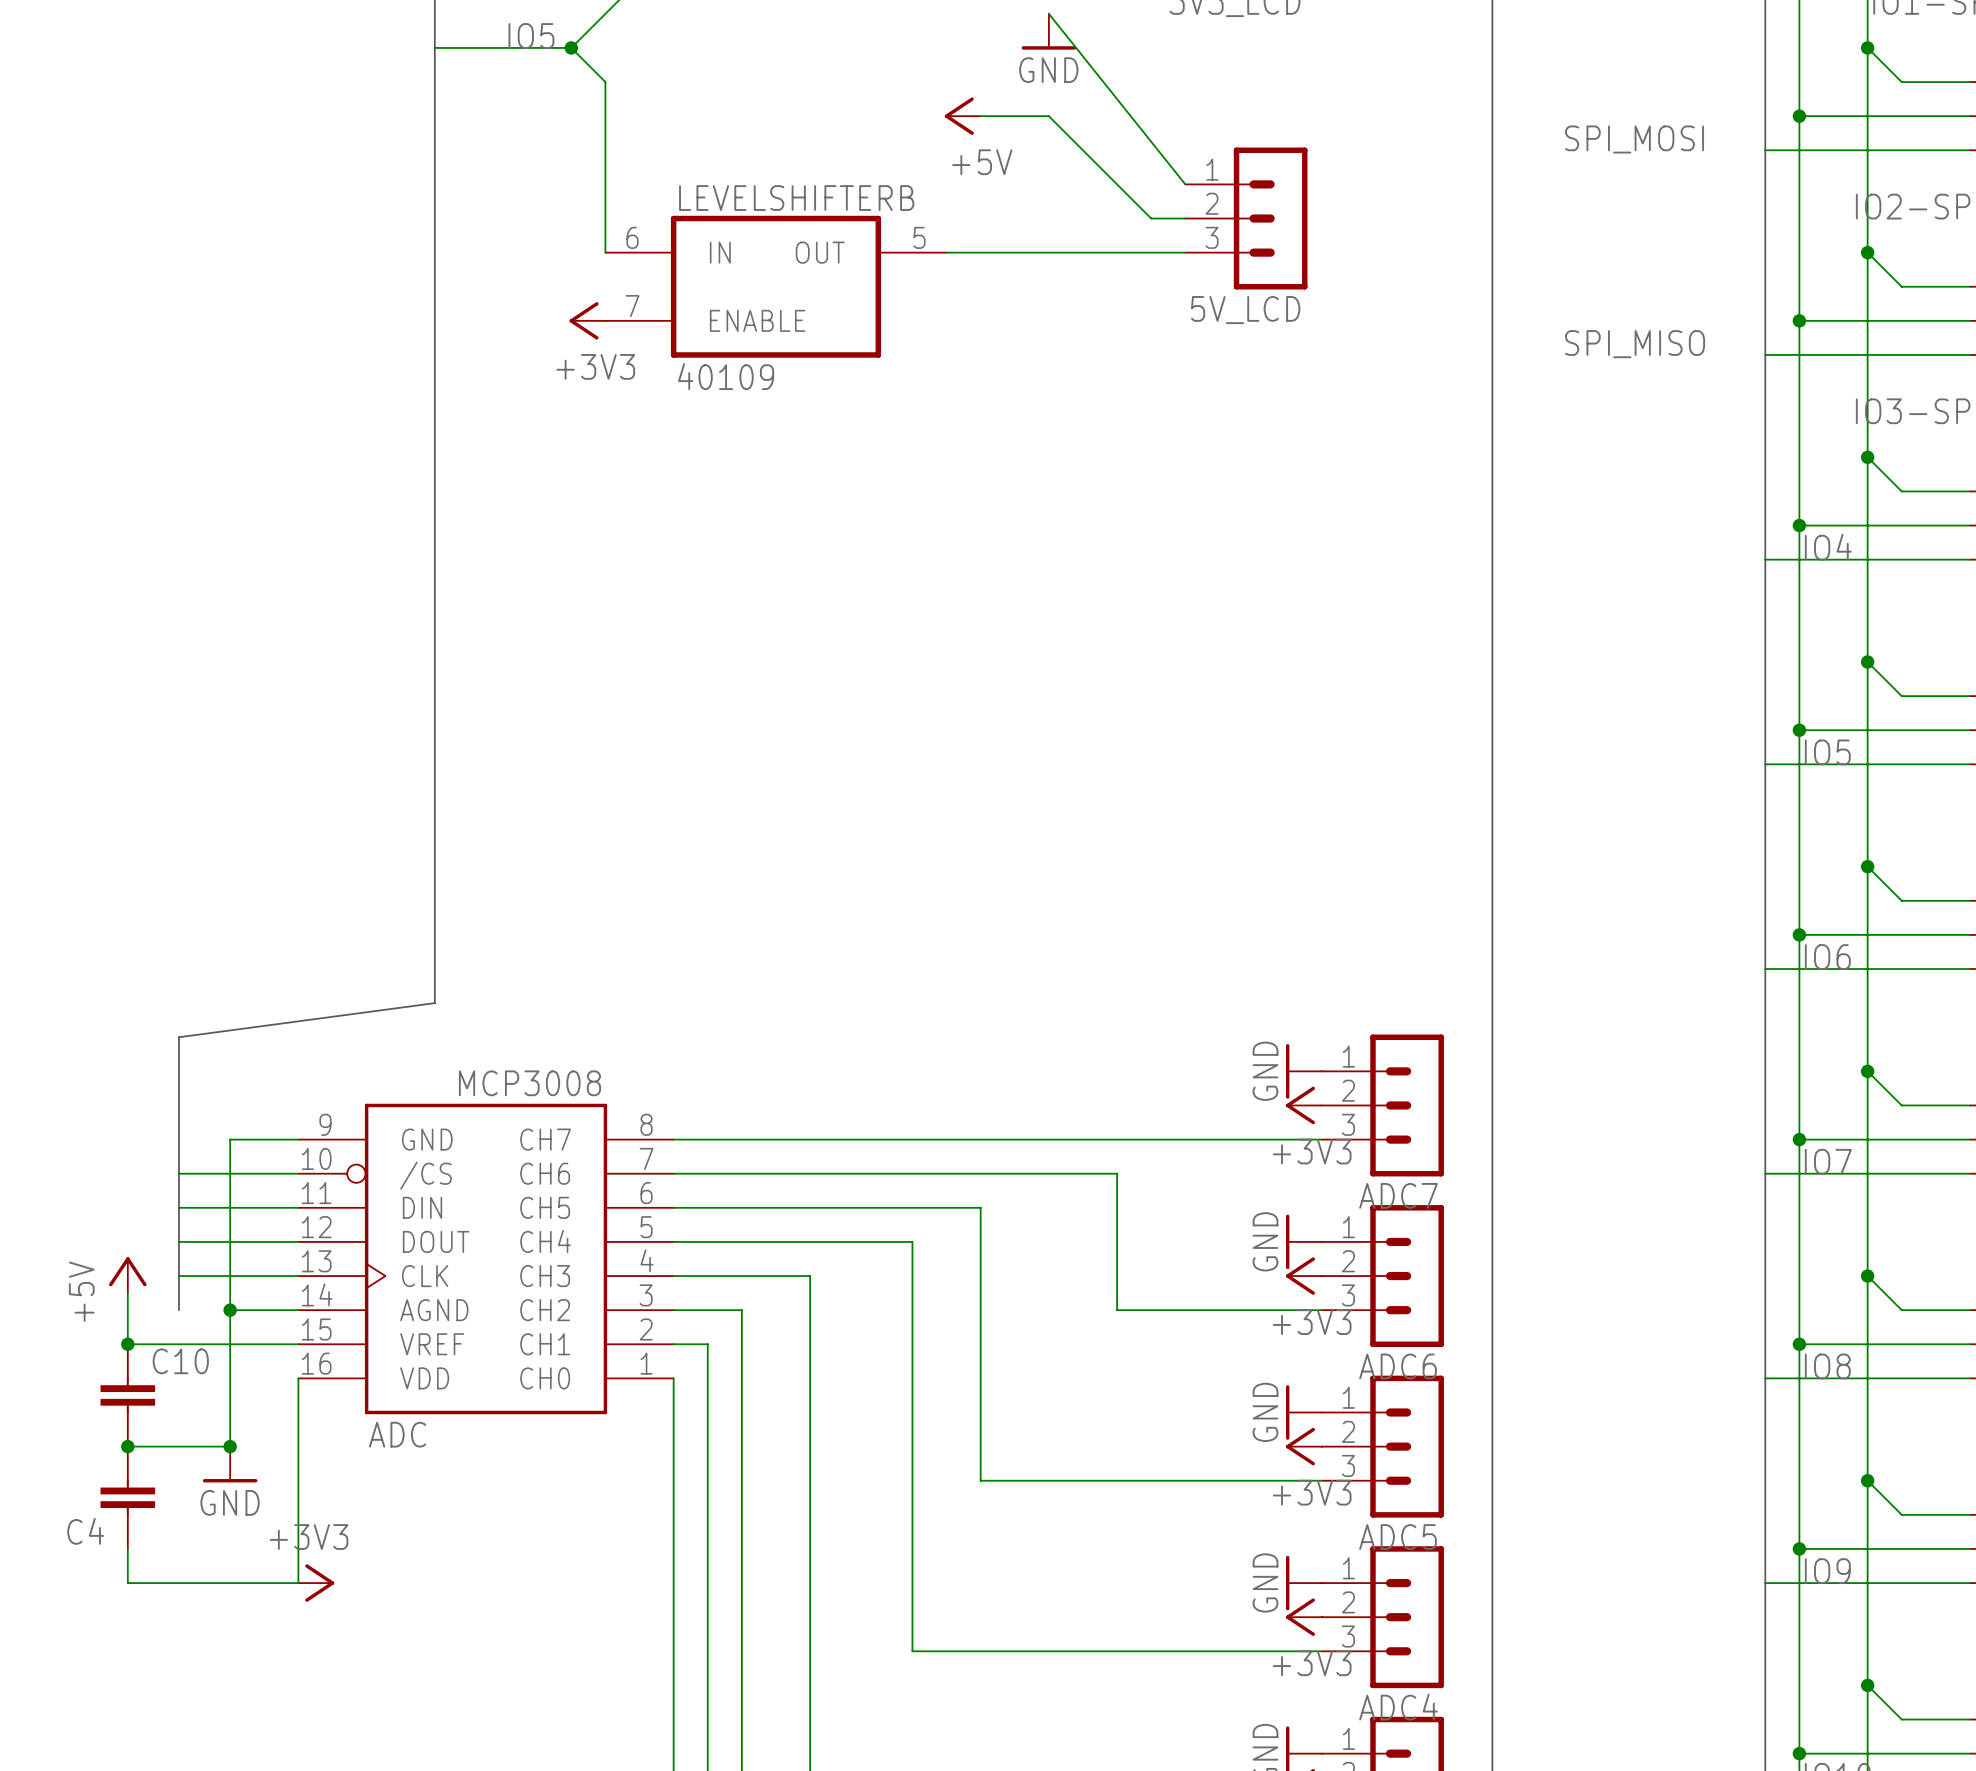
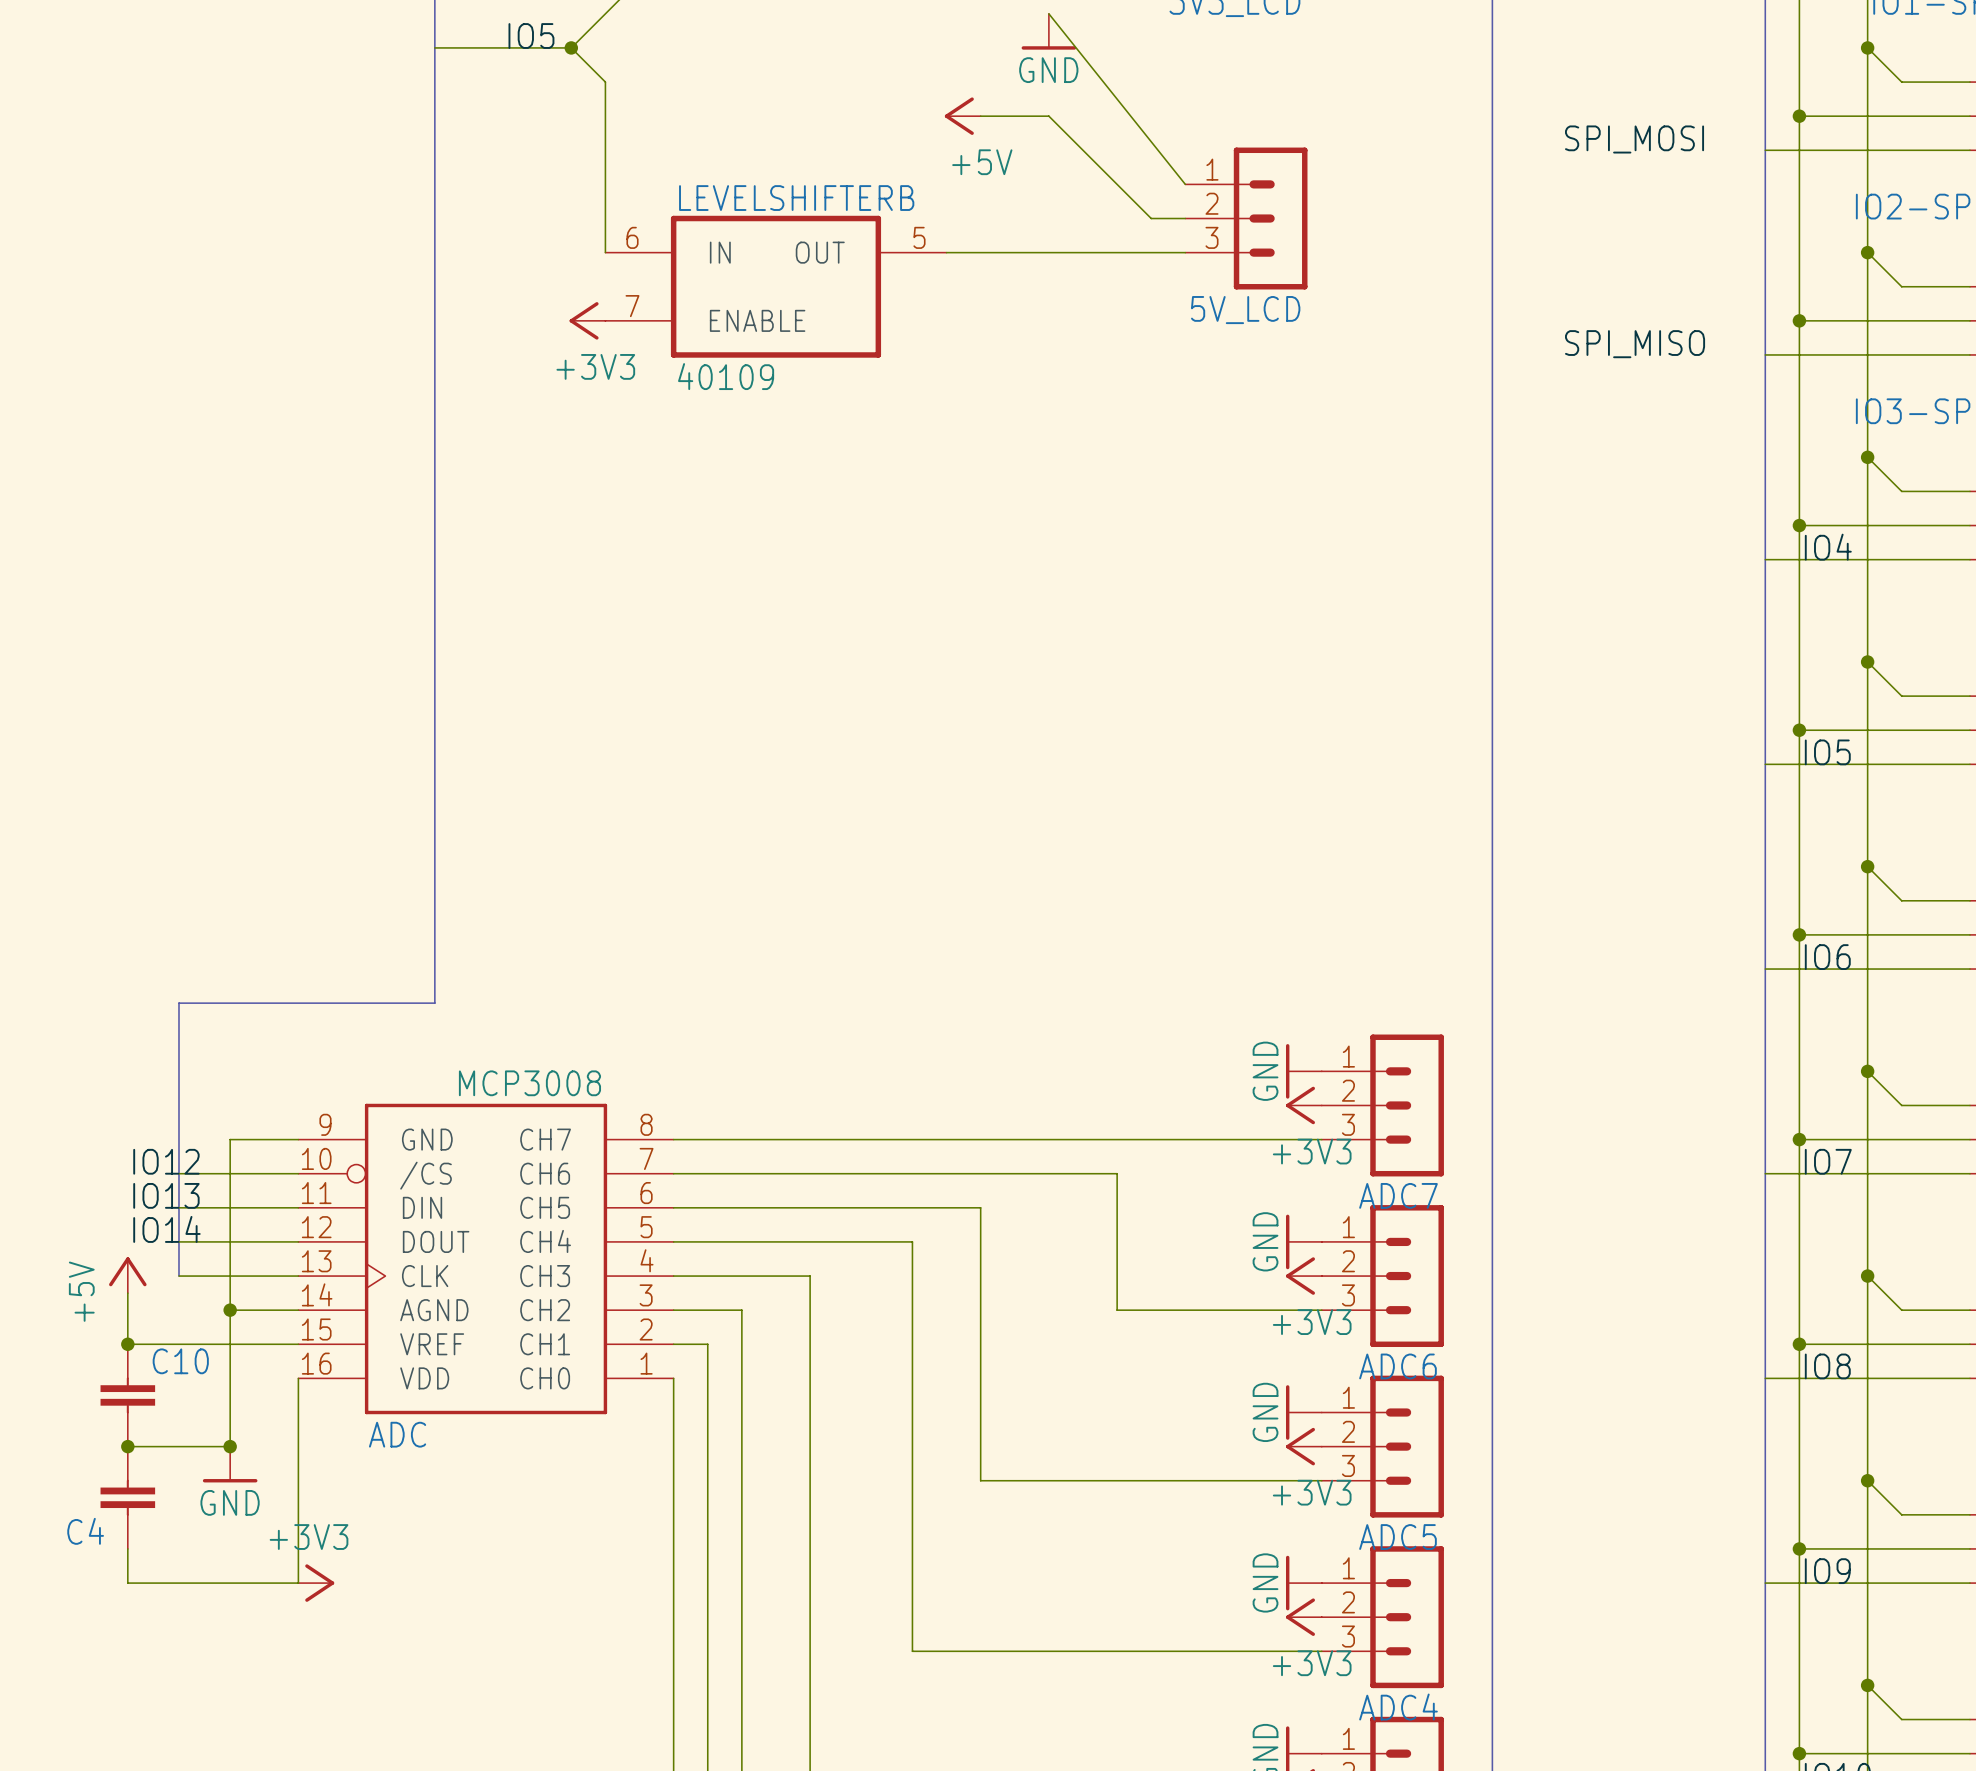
bus: (434, 1003) (178, 1037) -> (434, 1003) (178, 1003) (178, 1037)
label: none -> IO12 (166, 1161)
label: none -> IO13 (166, 1195)
label: none -> IO14 (166, 1229)
bus: (178, 1276) (178, 1310) -> none

